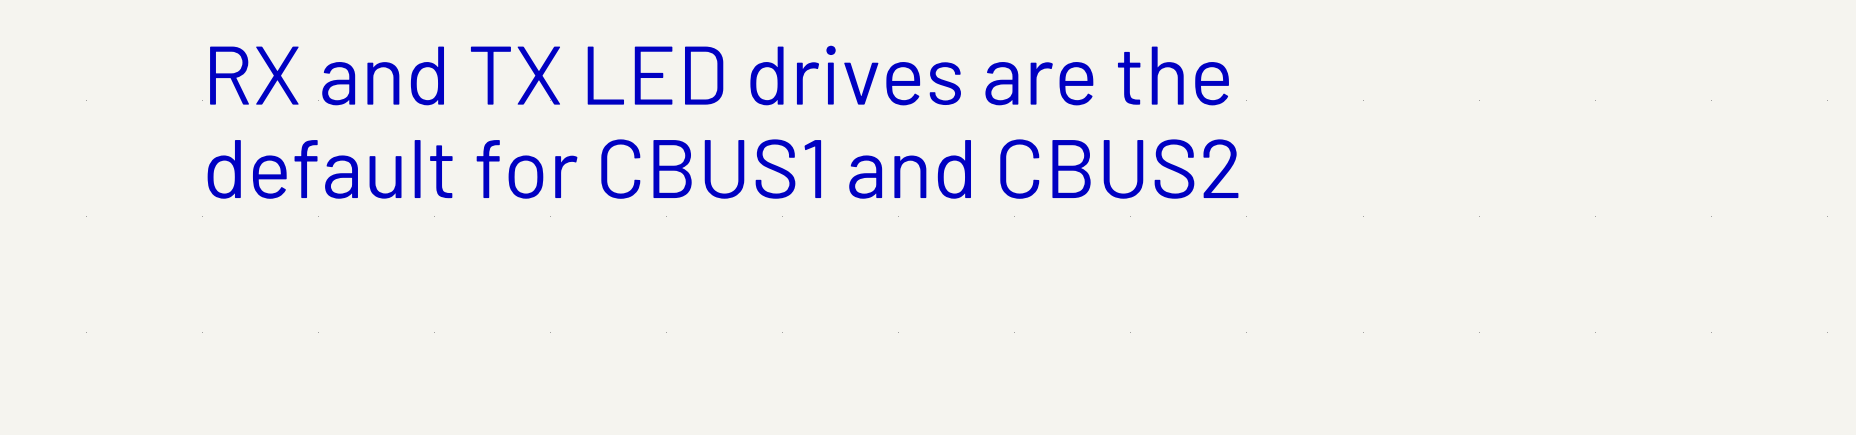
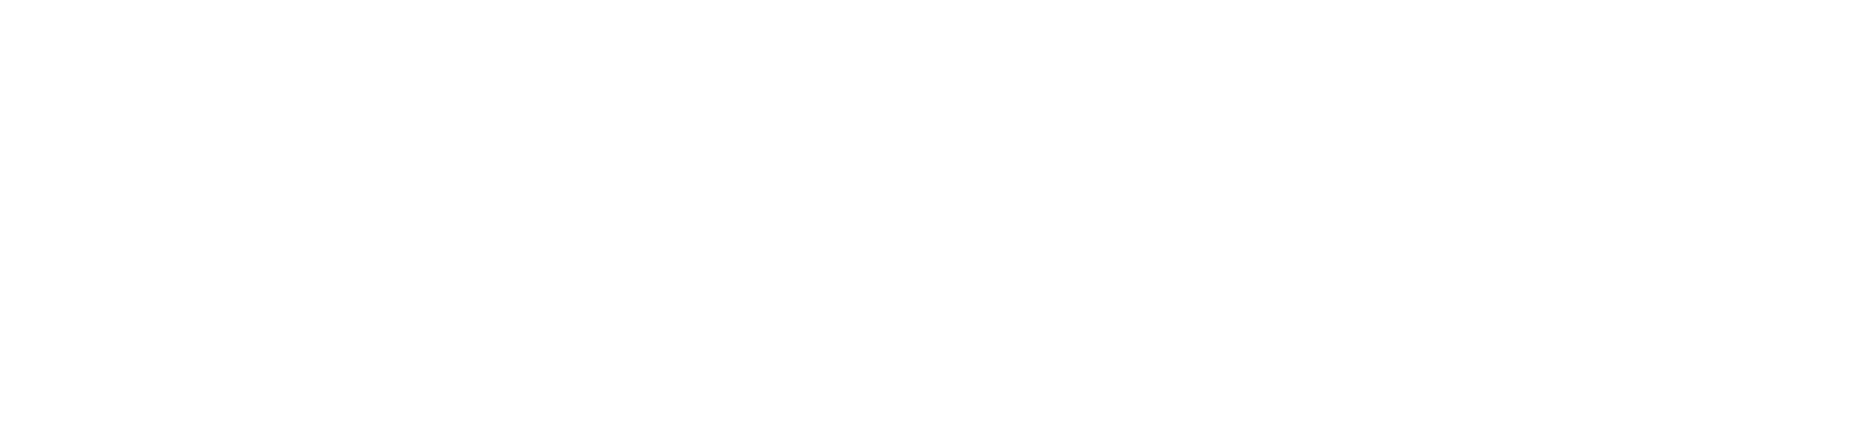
text: RX and TX LED drives are the (719, 75) -> none
text: default for CBUS1 and CBUS2 (723, 169) -> none

